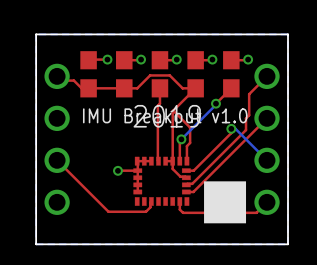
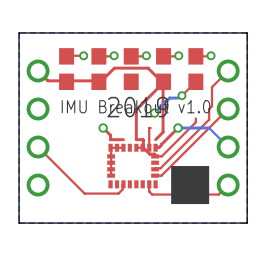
top track: (61, 80) (73, 80) (81, 88) (137, 88) (150, 75) (169, 75) (182, 88) (195, 88) (172, 111) (172, 168) (180, 176) (186, 177) -> (41, 74) (47, 80) (101, 80) (114, 68) (148, 68) (160, 80) (164, 80) (163, 132) (155, 139)
top track: (159, 88) (159, 103) (157, 105) (158, 161) -> none
top track: none -> (163, 83) (136, 109) (136, 139) (142, 139) (143, 147) (149, 154) (155, 154)
bottom track: (215, 103) (181, 139) -> none
bottom track: none -> (178, 98) (169, 98) (154, 113)
top track: (173, 110) (190, 127) (186, 161) -> none
via: none -> (154, 113)
bottom track: (231, 128) (235, 128) (246, 139) -> (178, 128) (209, 128)
via: (231, 128) -> none
top track: none -> (103, 128) (110, 135) (110, 139) (123, 139)
via: none -> (103, 128)
via: (181, 139) -> none
top track: none -> (178, 128) (159, 147) (155, 148)
via: none -> (178, 128)
via: (117, 170) -> none
top track: (137, 170) (118, 170) -> none

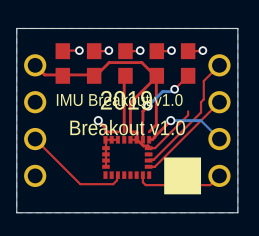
top track: none -> (127, 74) (124, 78) (124, 131)
top track: (150, 128) (149, 128) -> (148, 106) (142, 111) (142, 120)
text: none -> Breakout v1.0 (127, 127)

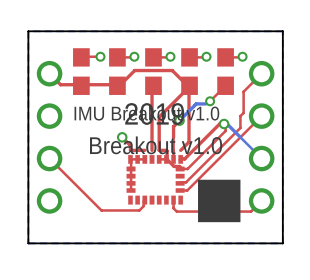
top track: (170, 120) (154, 137) -> (224, 123) (219, 123) (187, 156)
via position: (170, 120) -> (224, 123)
bottom track: (201, 120) (170, 120) -> (240, 137) (227, 123) (224, 123)

